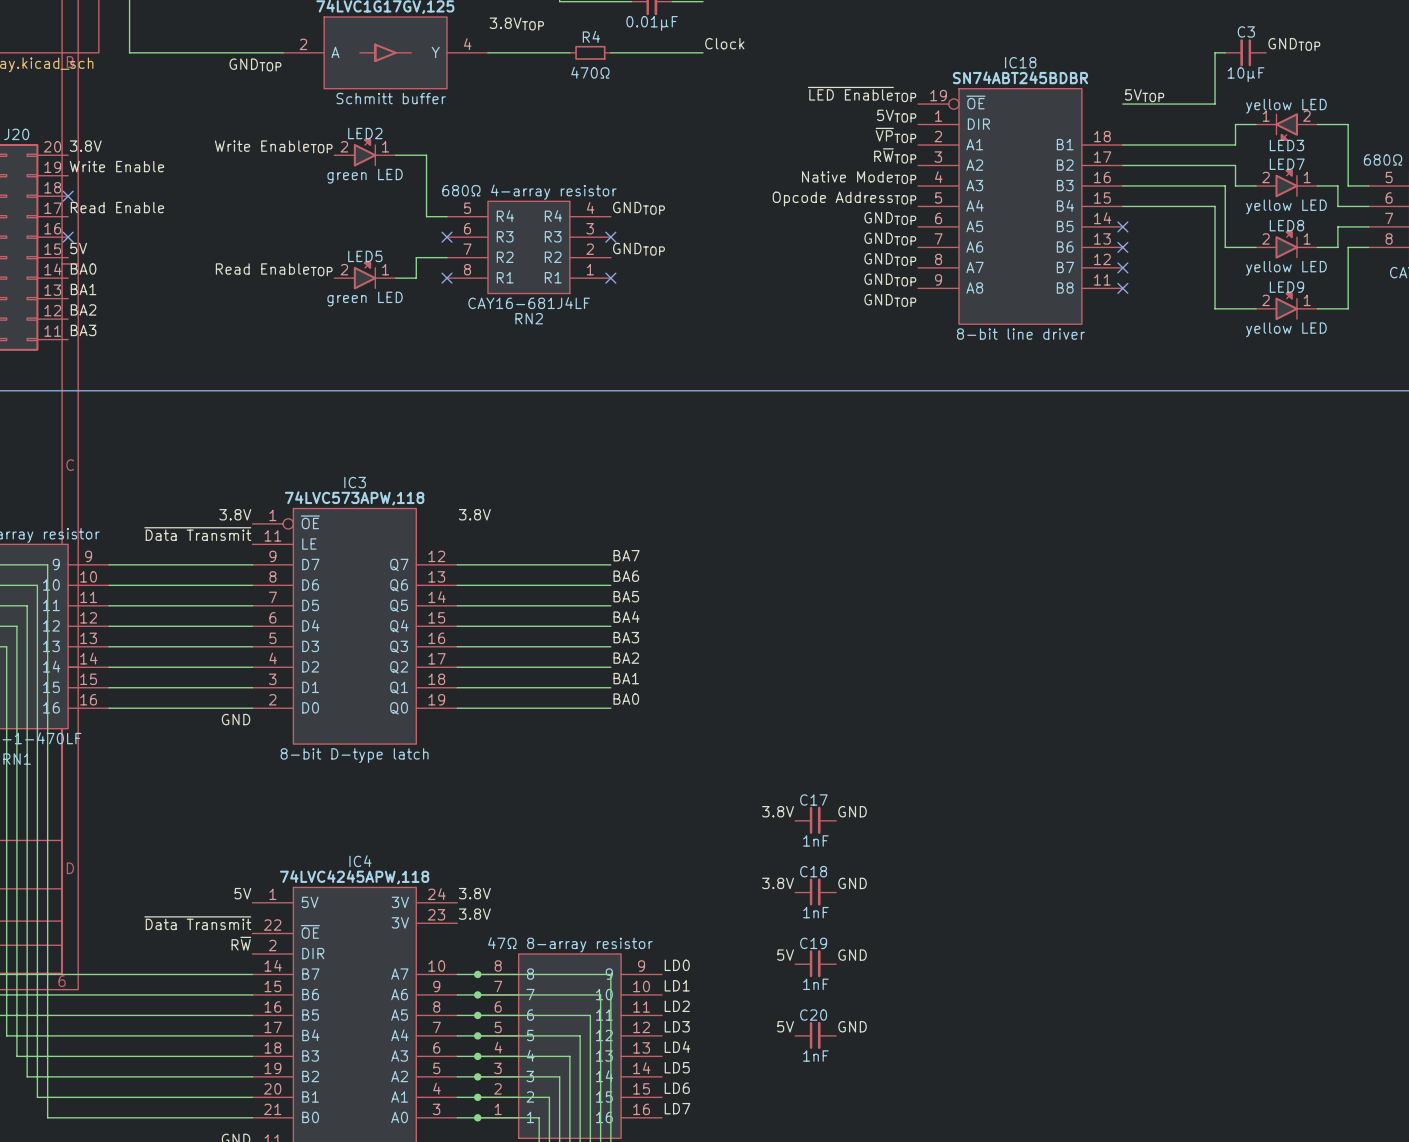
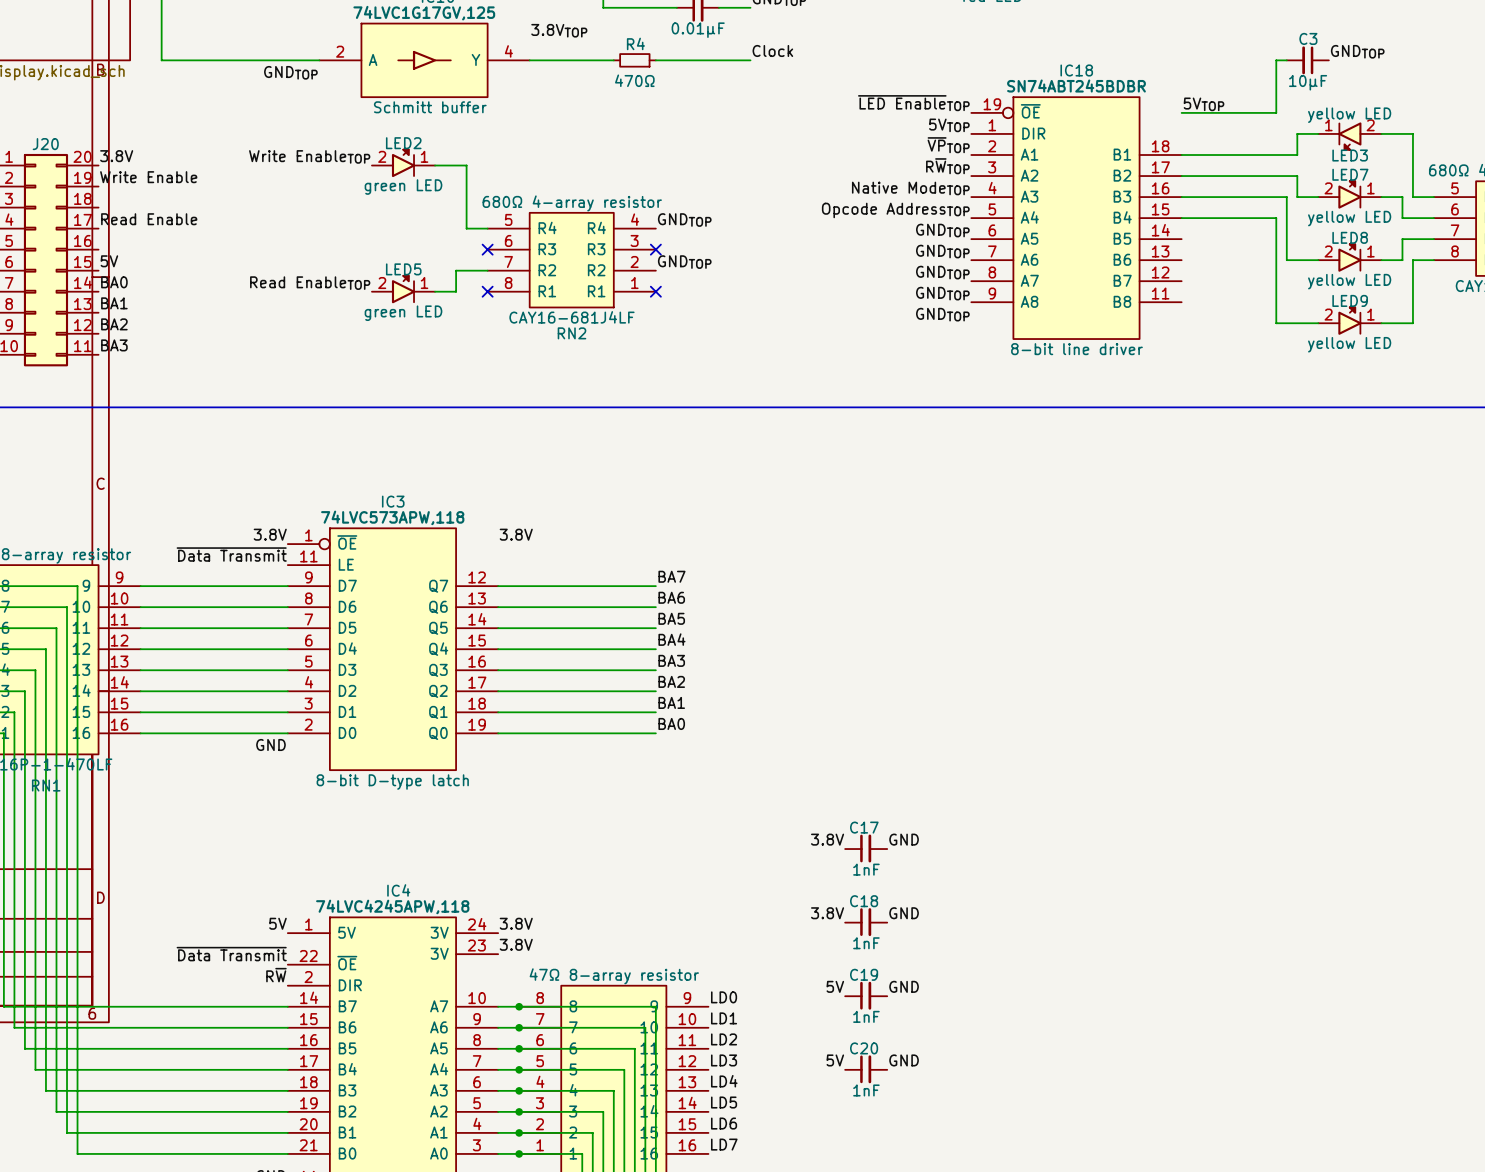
no-connect mark: (68, 196) -> none
no-connect mark: (1122, 226) -> none
no-connect mark: (68, 237) -> none
no-connect mark: (1122, 247) -> none
no-connect mark: (1122, 267) -> none
no-connect mark: (1122, 288) -> none

